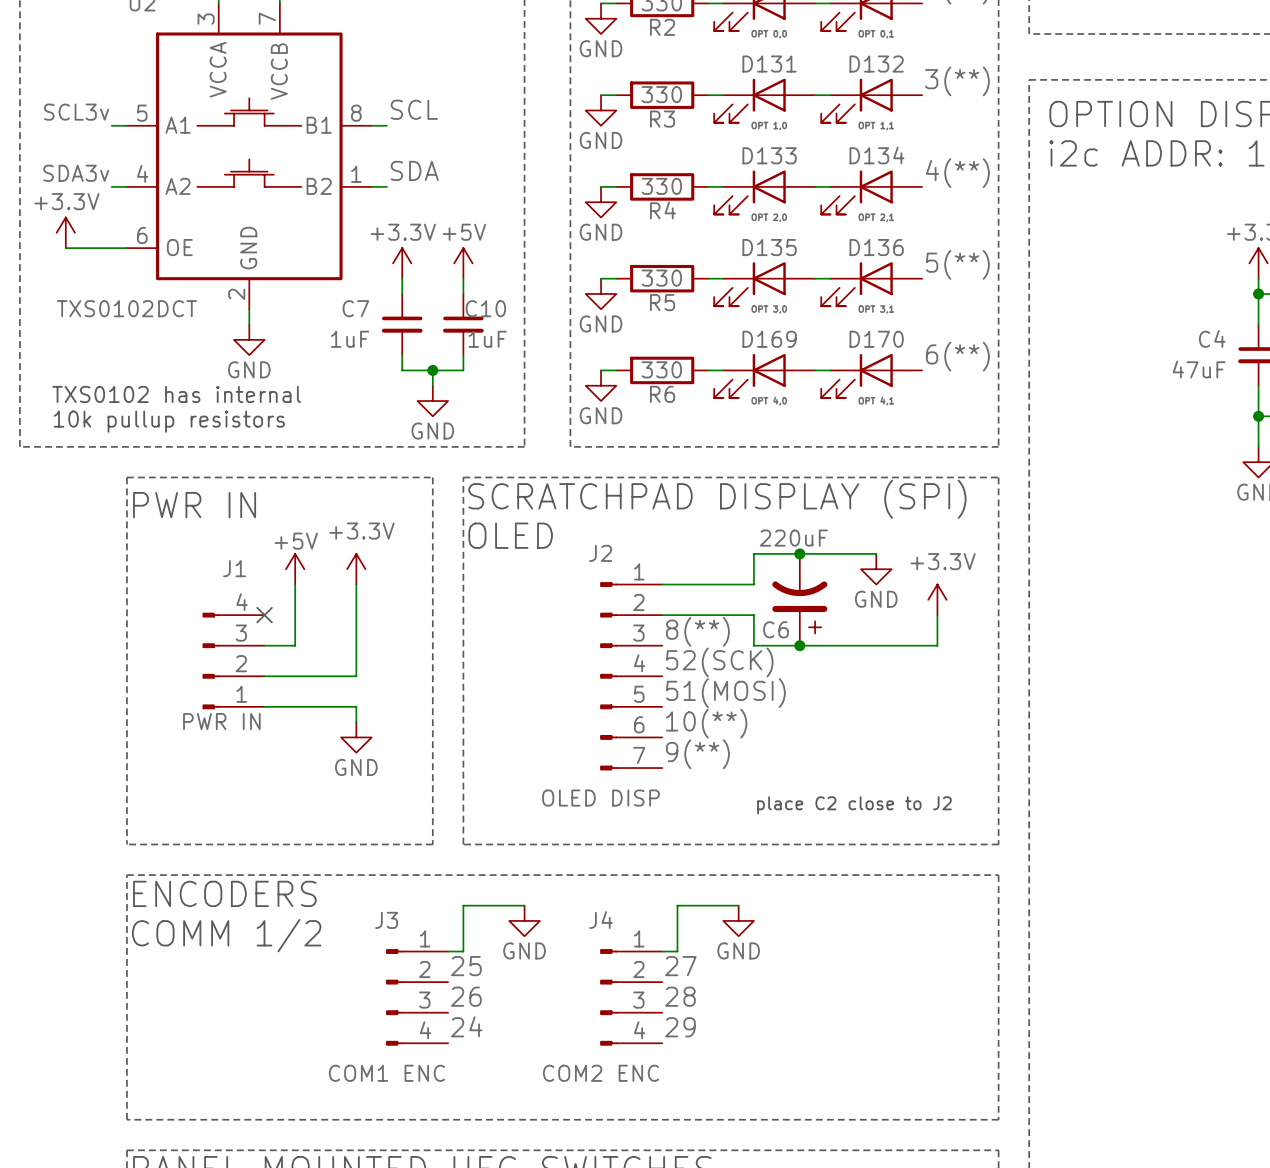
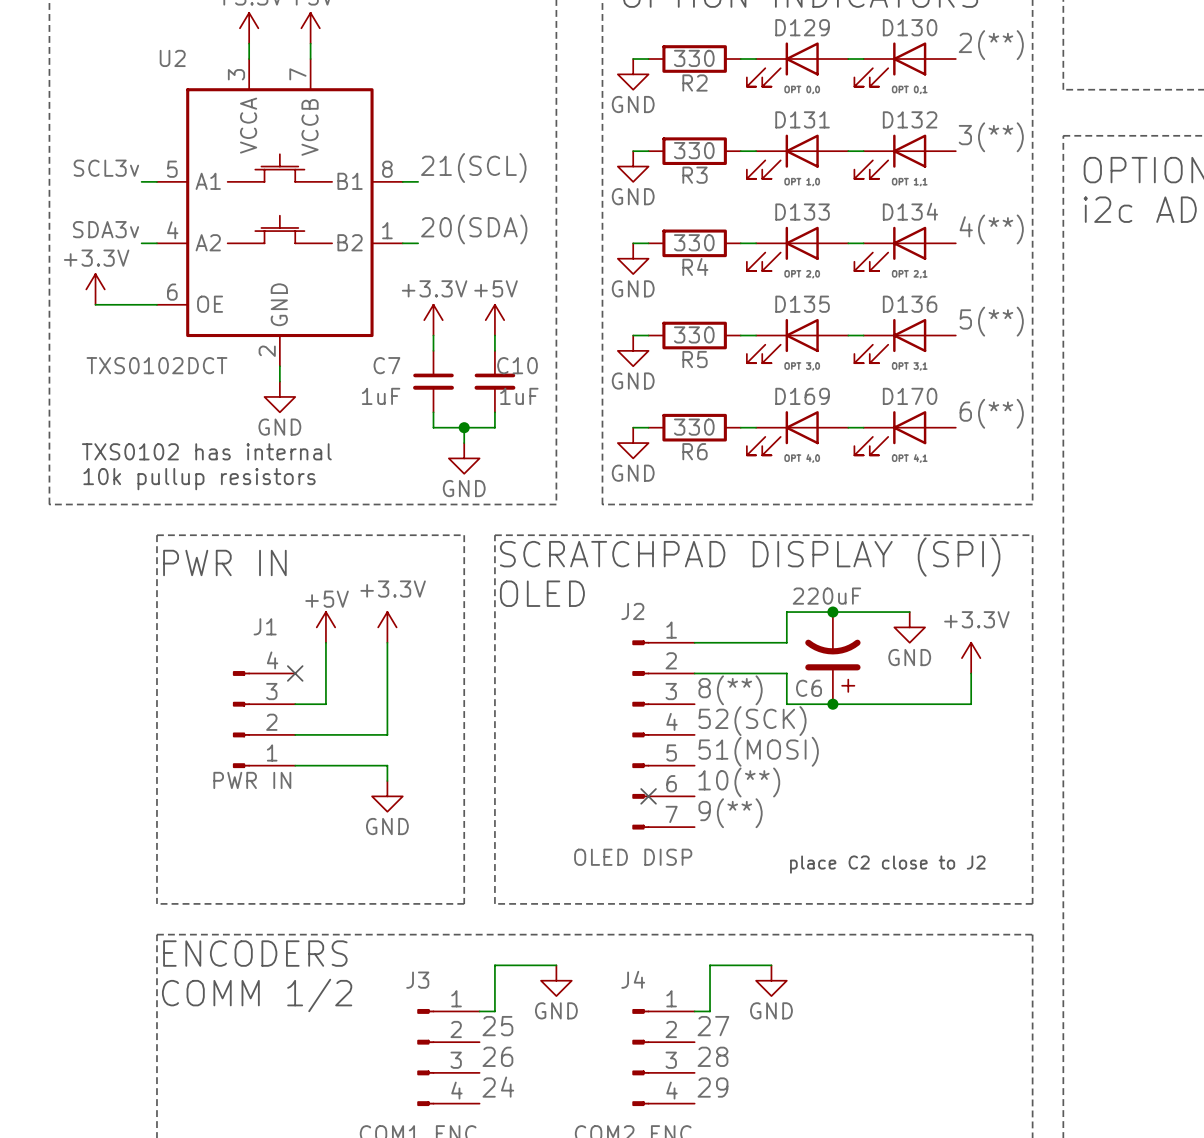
label: SCL (414, 109) -> 21(SCL) (473, 168)
label: SDA (414, 170) -> 20(SDA) (474, 229)
no-connect mark: none -> (648, 796)

